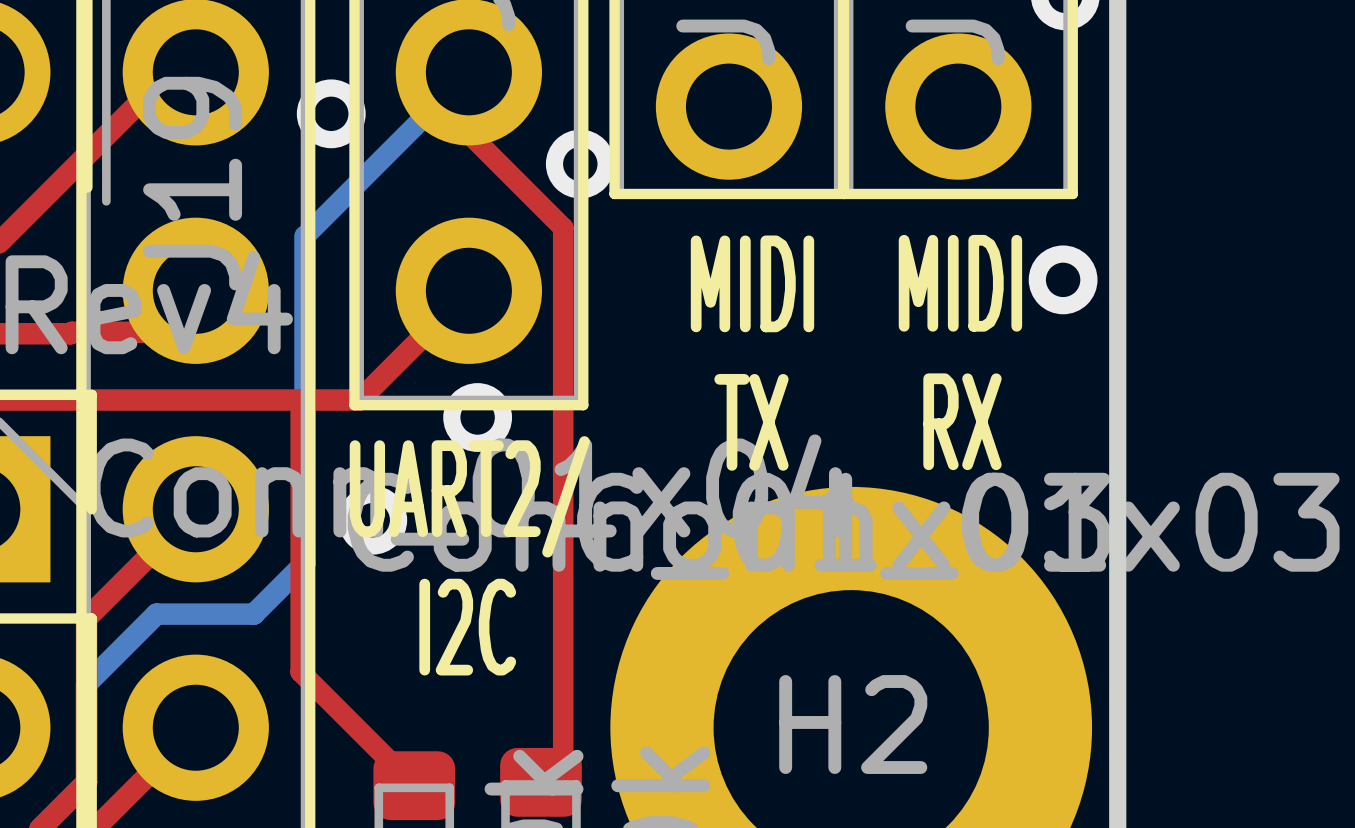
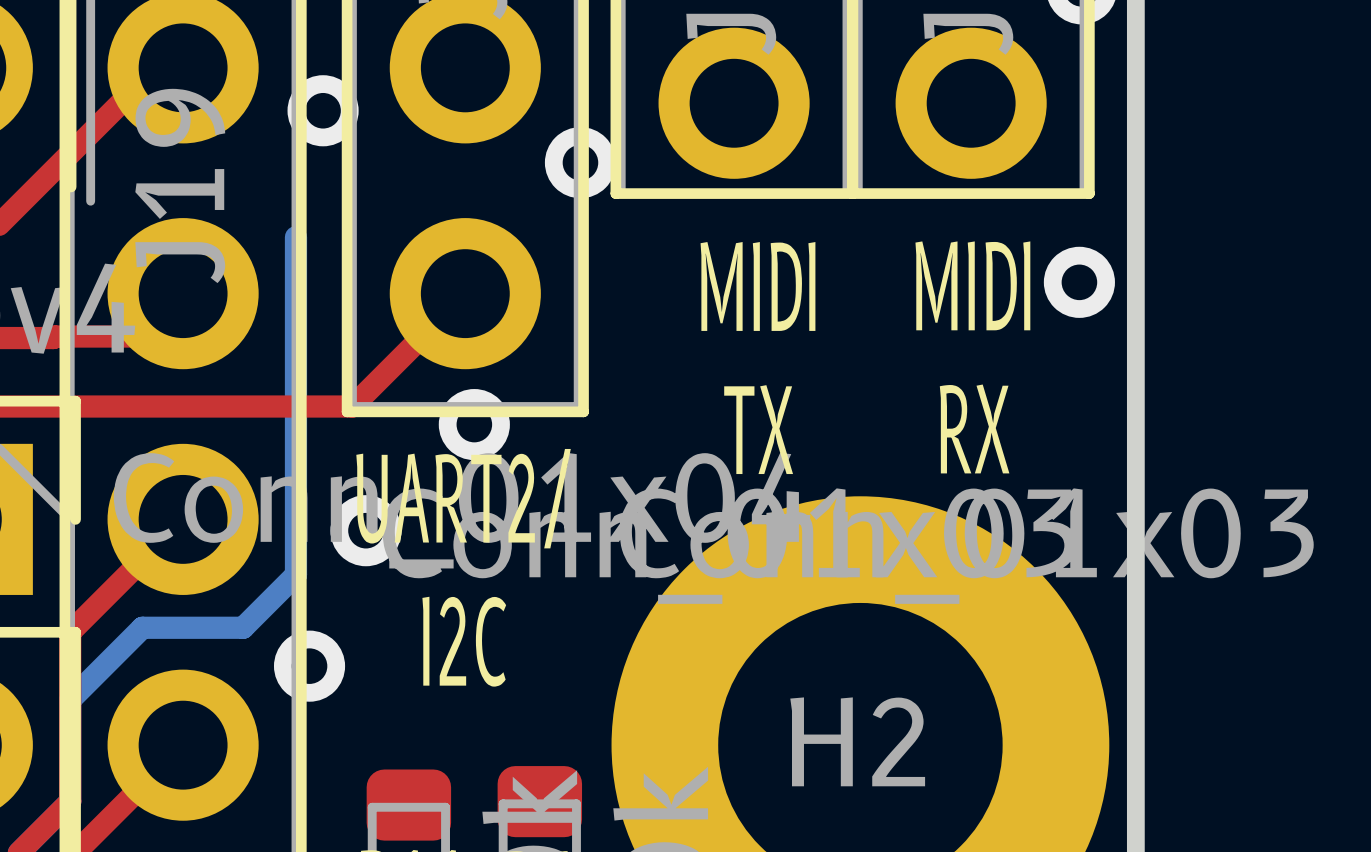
bottom track: (468, 72) (305, 236) -> none
top track: (468, 72) (468, 133) (563, 227) (563, 760) (540, 782) -> none
top track: (300, 400) (300, 672) (414, 785) -> none
via: none -> (309, 666)

